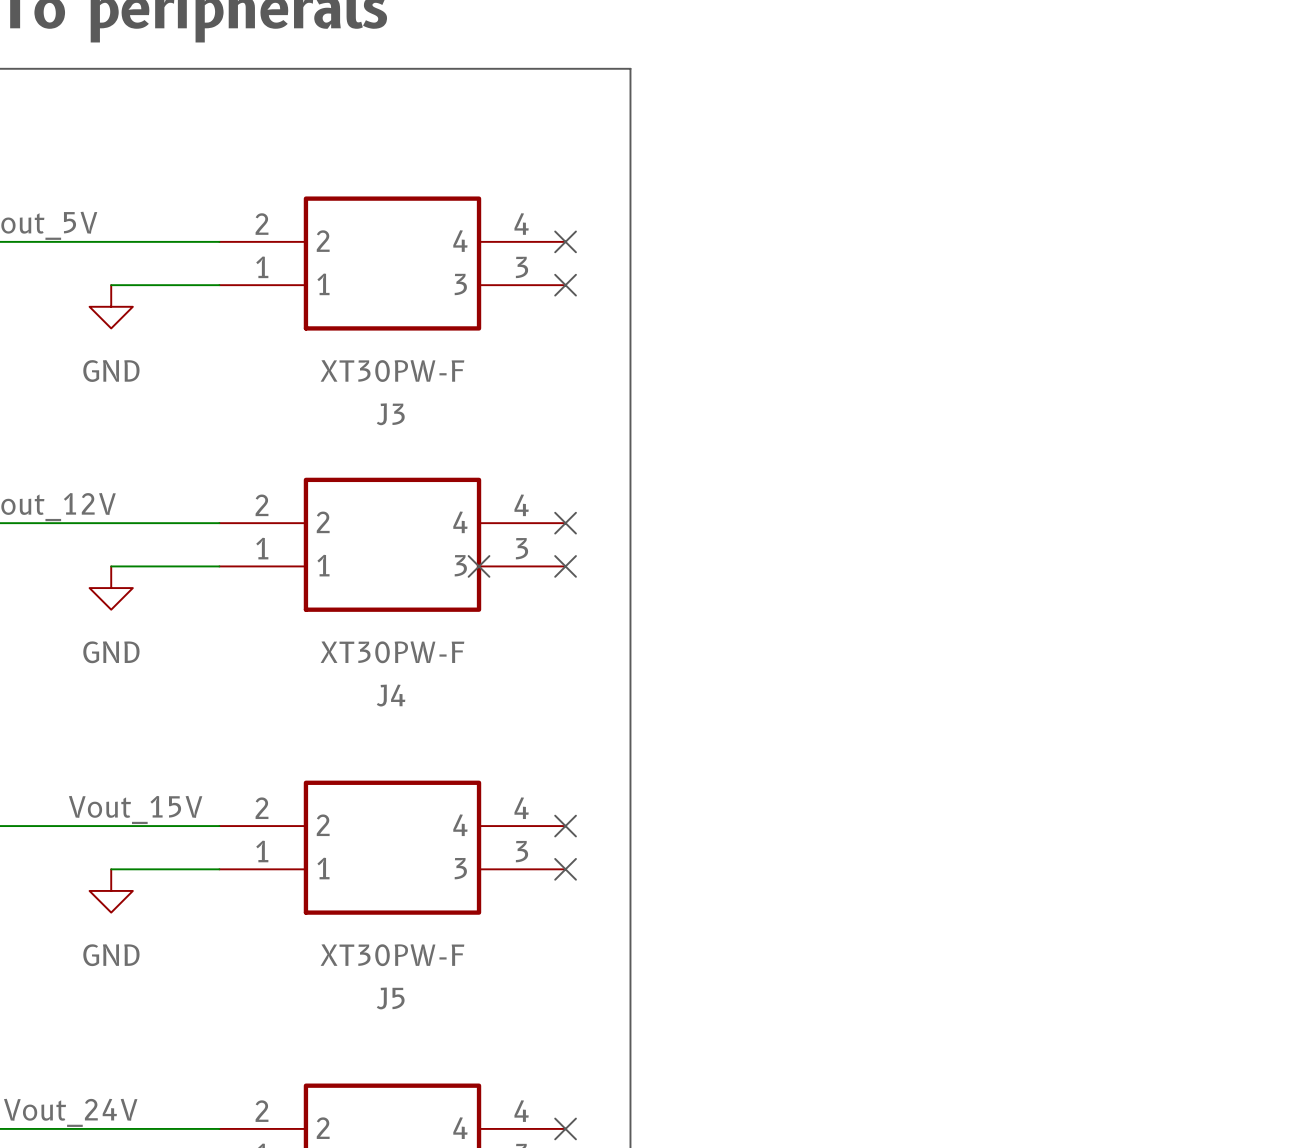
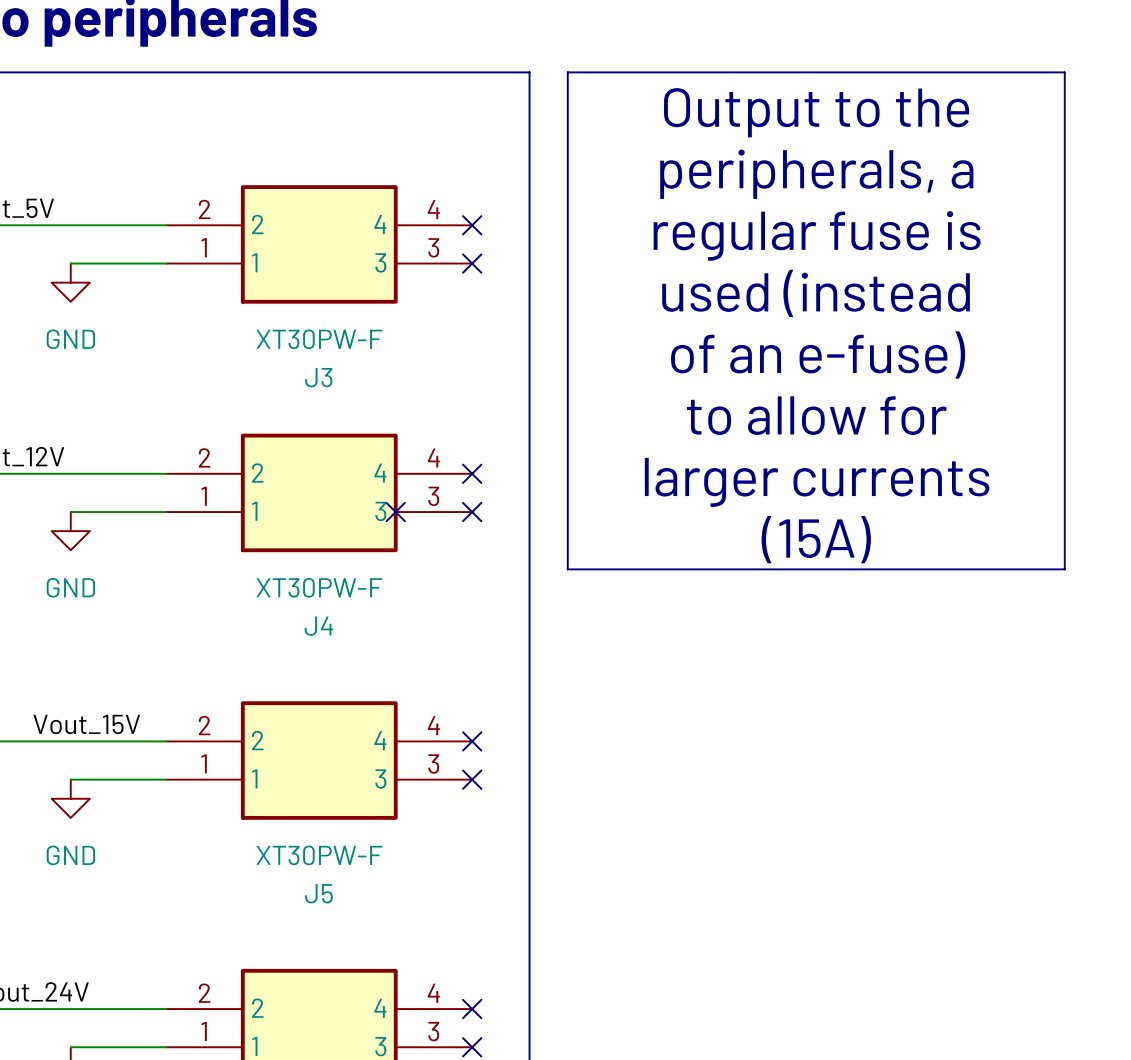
line: none -> (567, 72) (1064, 72) (1064, 569) (567, 569) (567, 72)
text: none -> Output to the (816, 112)
text: none -> peripherals, a (816, 174)
text: none -> regular fuse is (817, 235)
text: none -> used (instead (816, 293)
text: none -> of an e-fuse) (818, 354)
text: none -> to allow for (816, 415)
text: none -> larger currents (817, 482)
text: none -> (15A) (816, 539)

